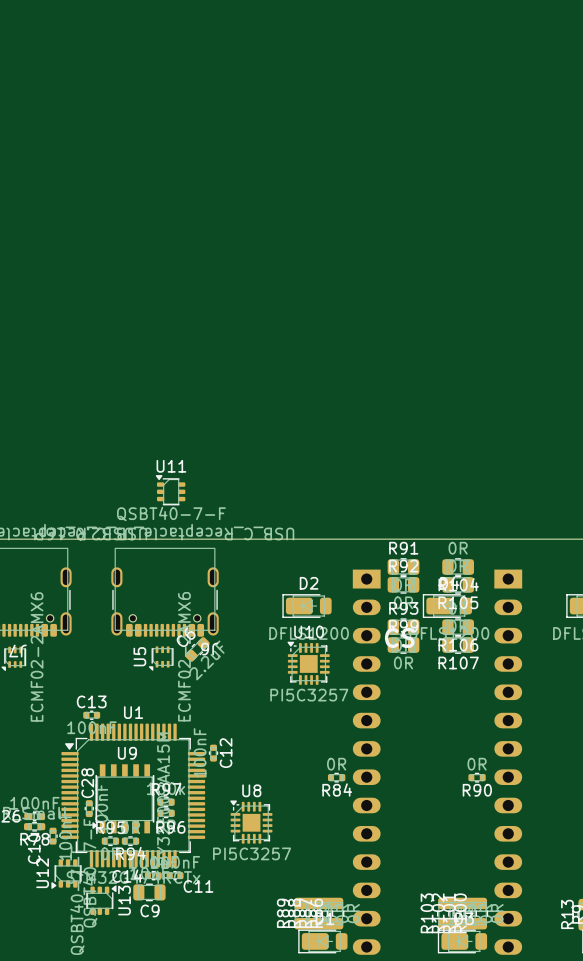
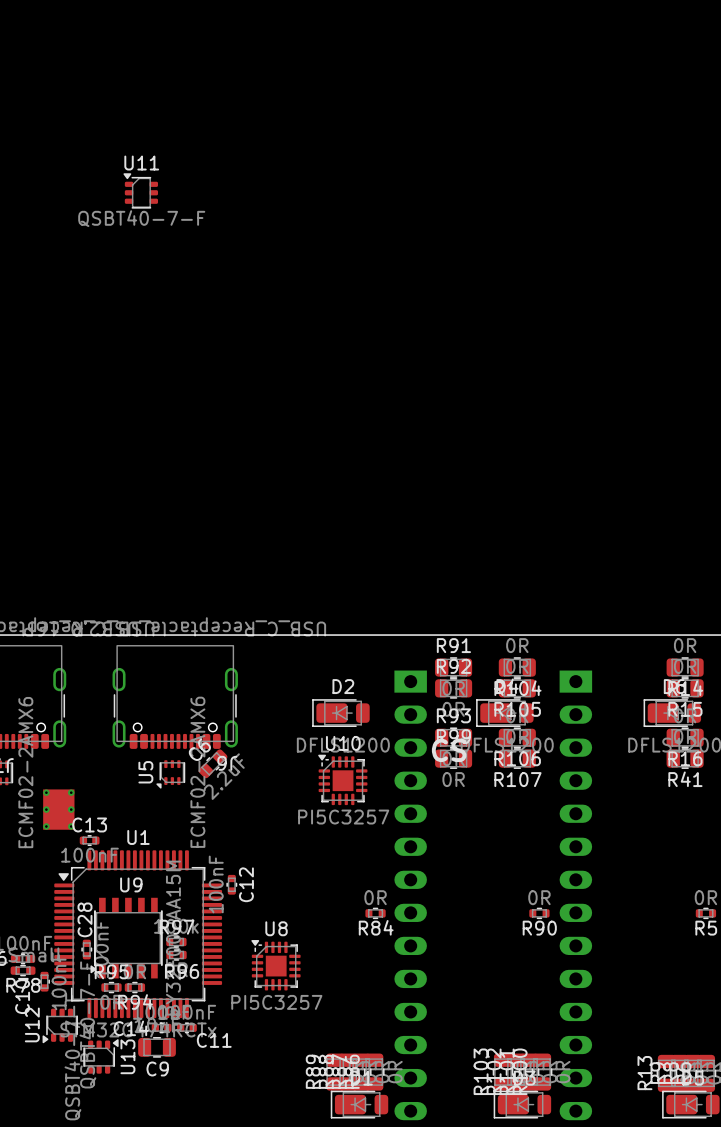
U11 position: (170, 490) -> (140, 190)
part: none -> (58, 809)

